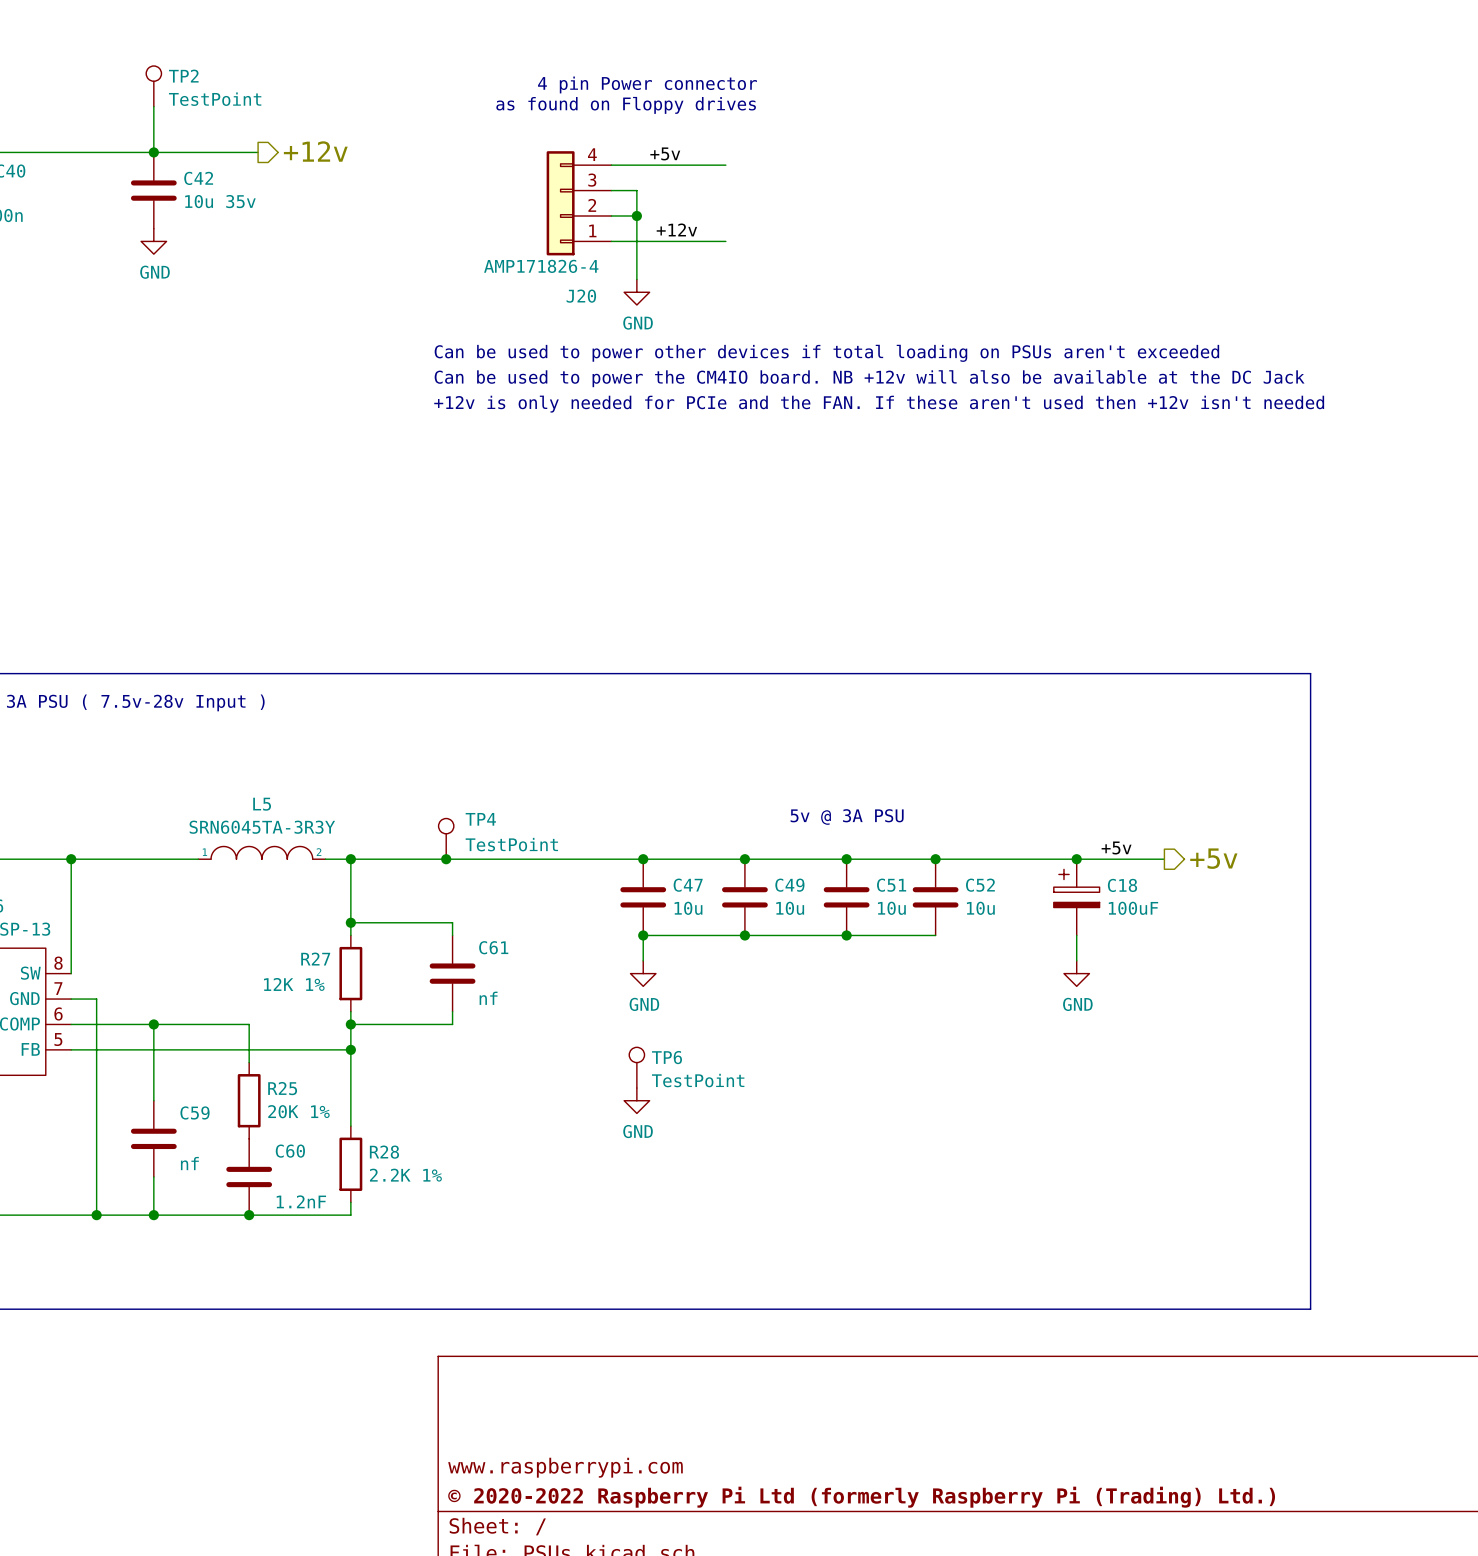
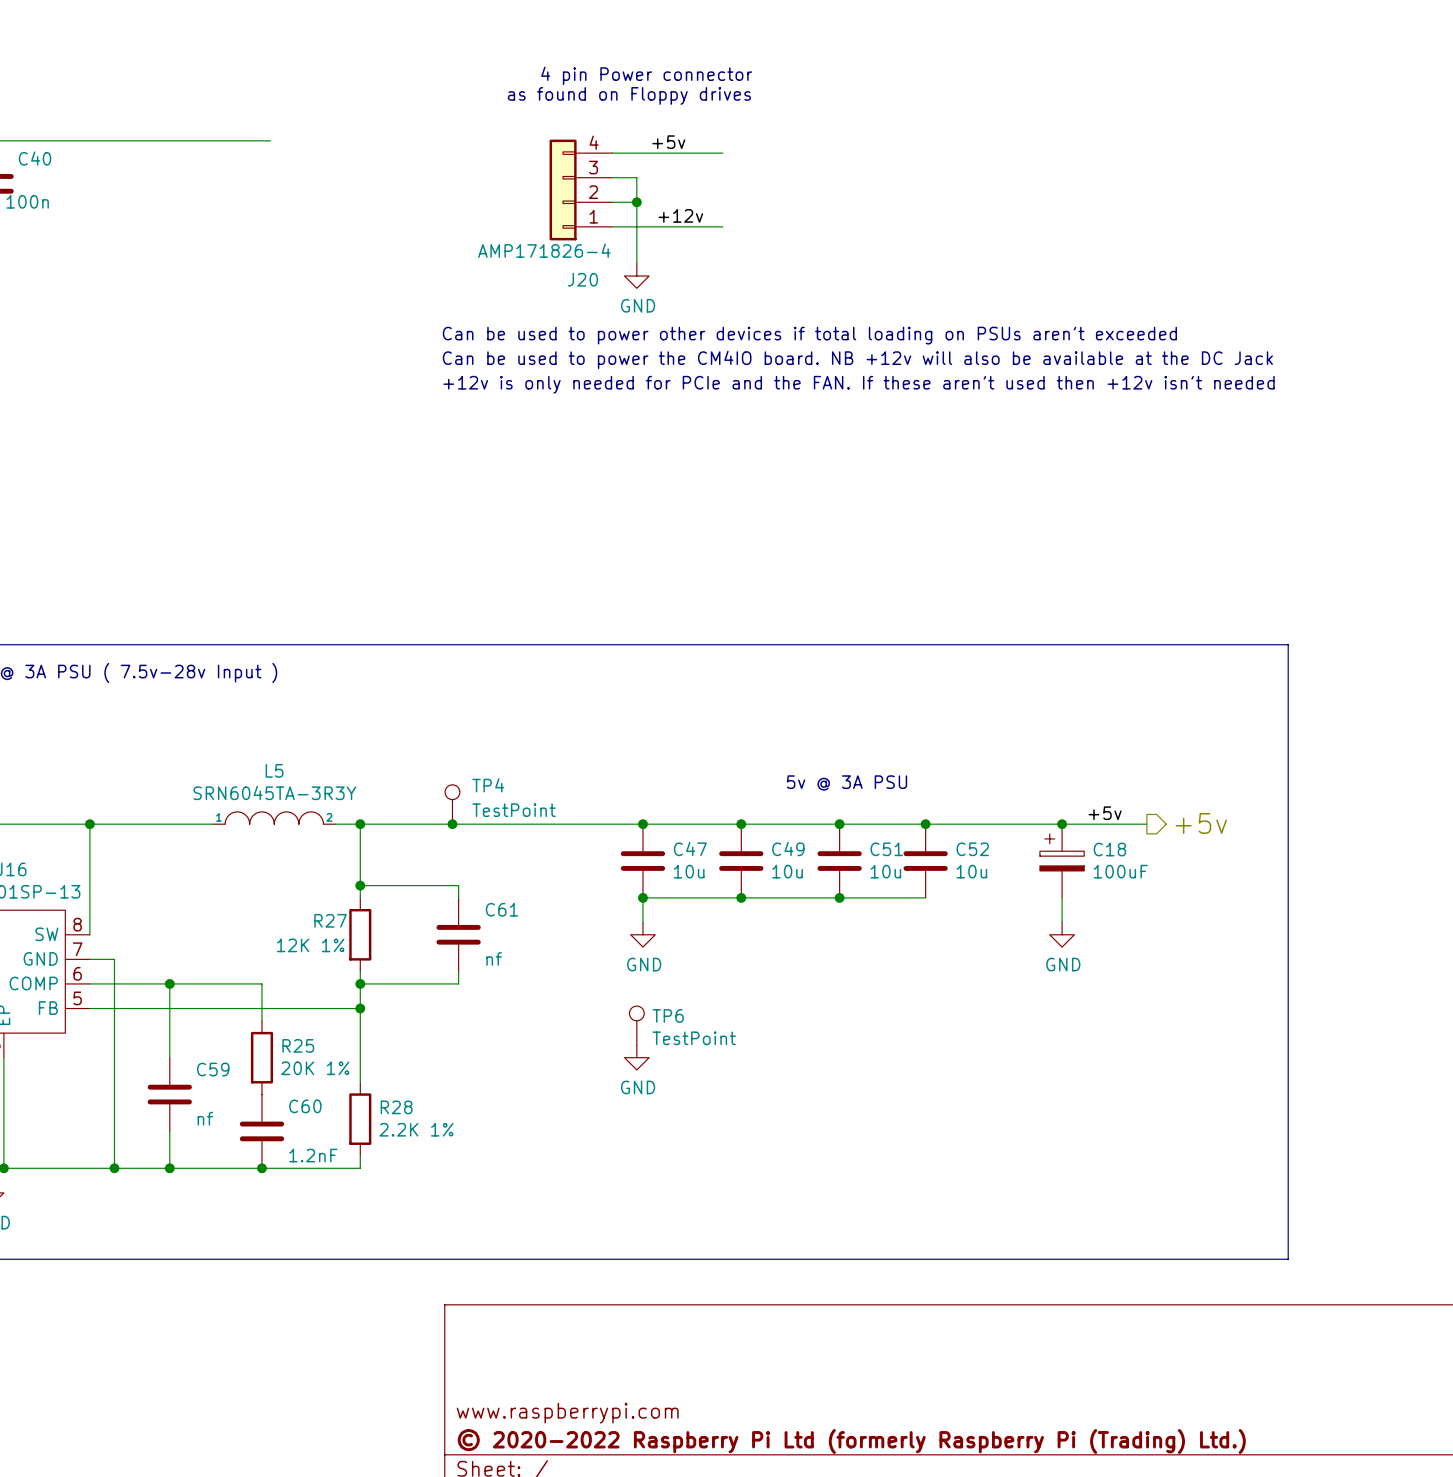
TP2: TestPoint (153, 86) -> none
wire: (153, 106) (153, 152) -> none
hierarchical label: +12v (315, 151) -> none
junction: (153, 152) -> none
C42: 10u 35v (153, 190) -> none
power symbol: GND (153, 241) -> none

